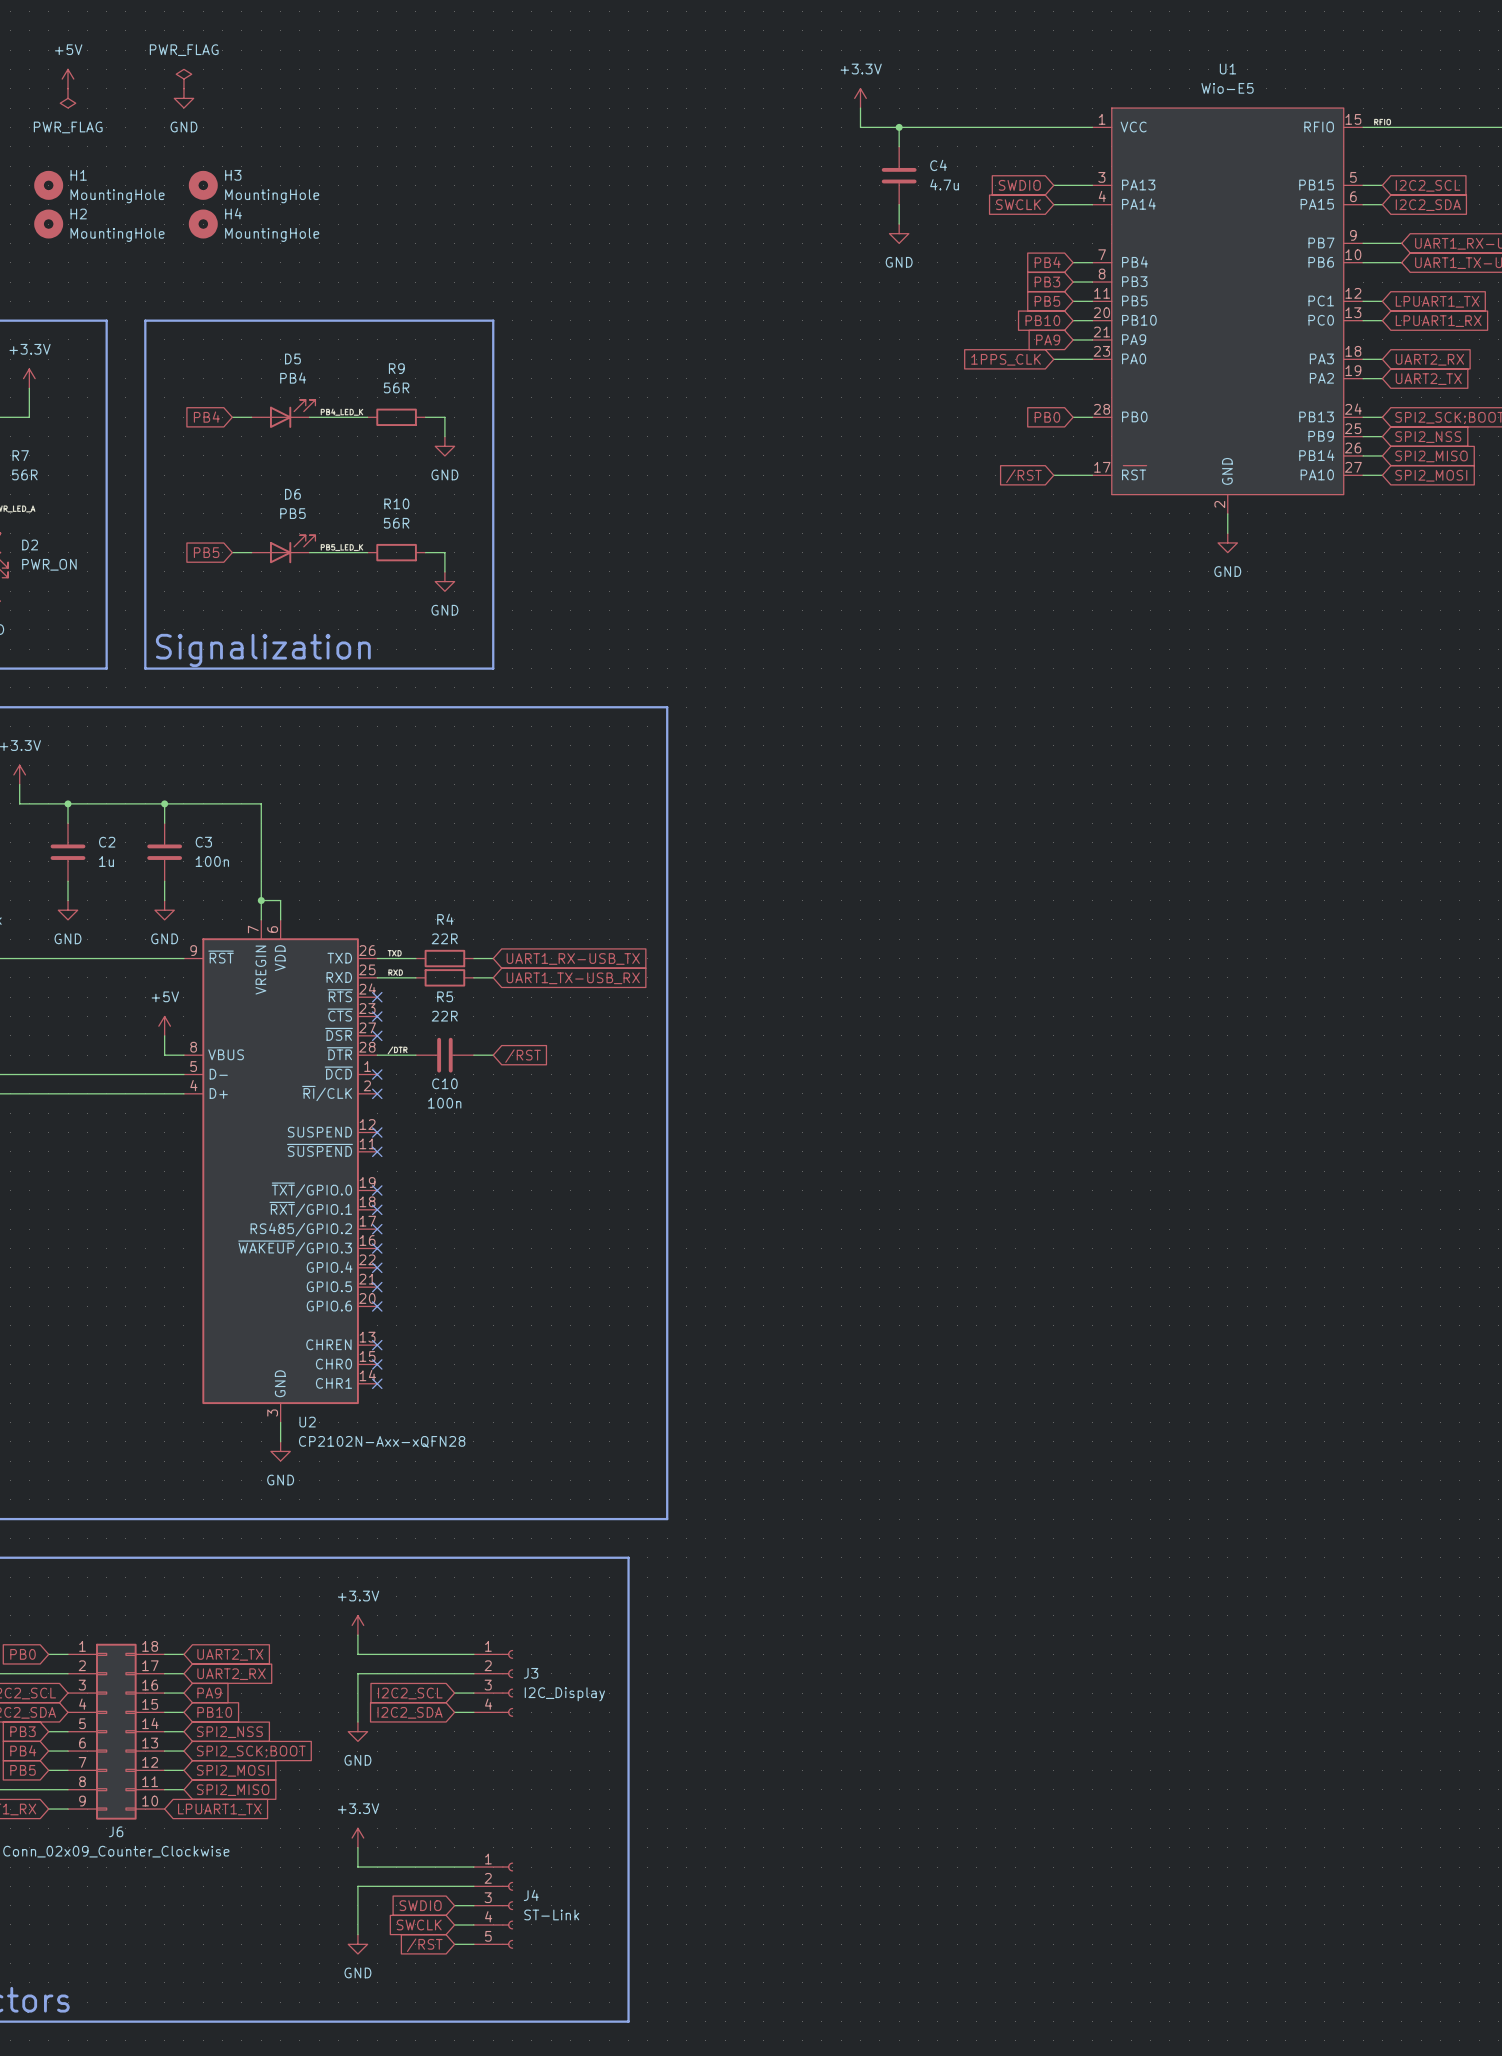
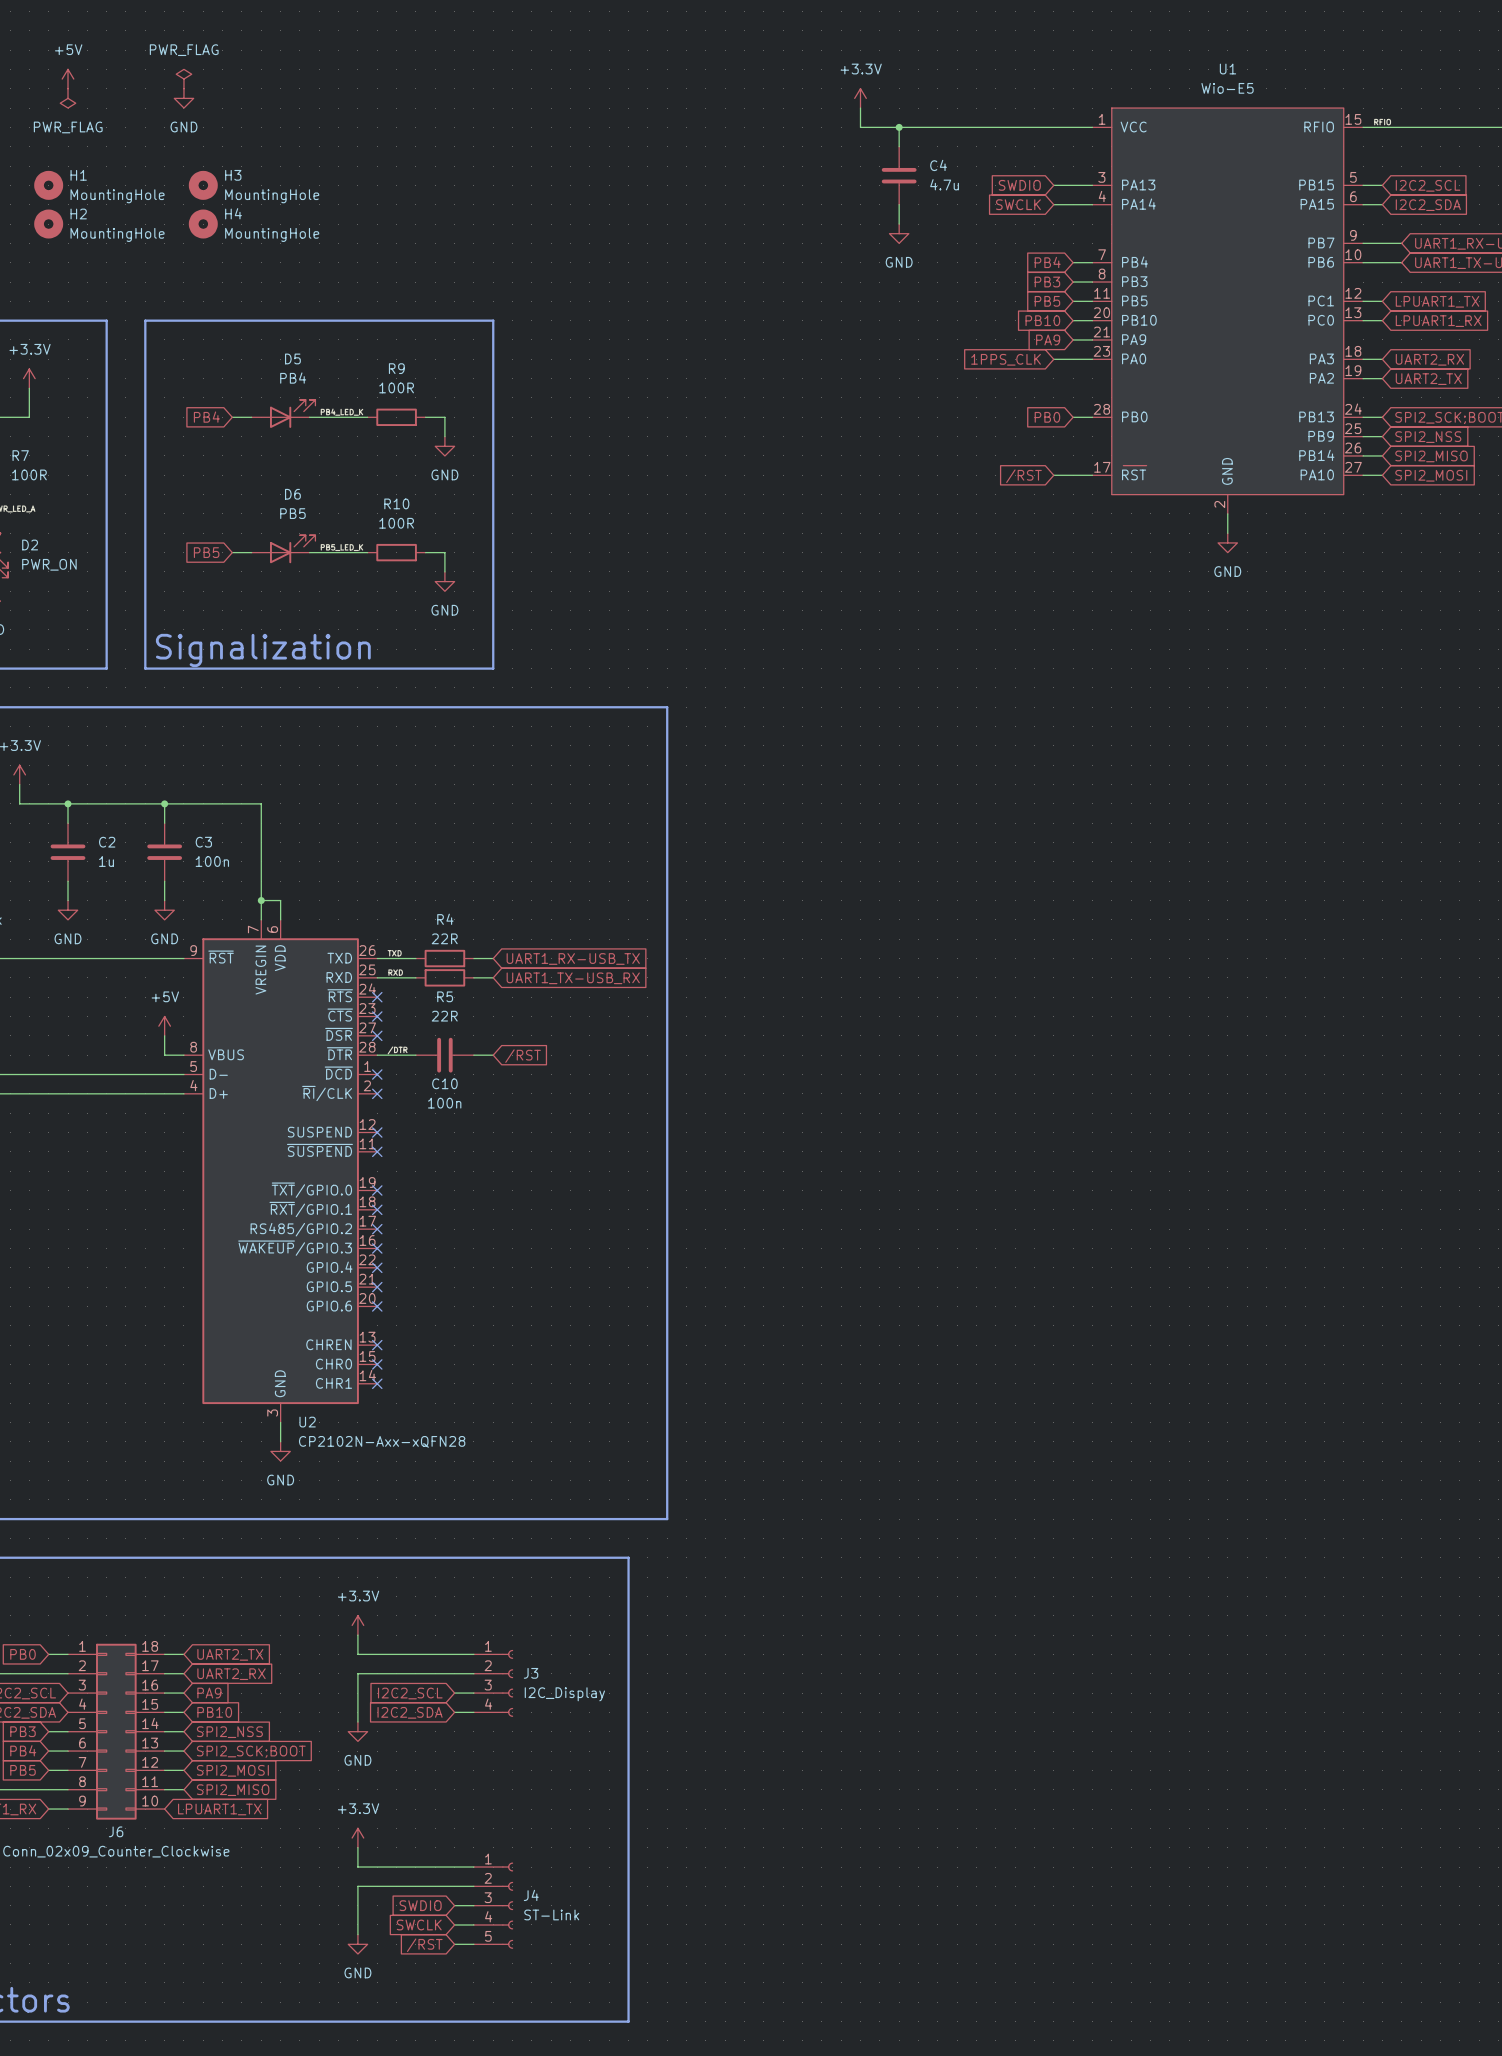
R9 value: 56R (396, 387) -> 100R (396, 387)
R7 value: 56R (24, 474) -> 100R (29, 474)
R10 value: 56R (396, 523) -> 100R (396, 523)

